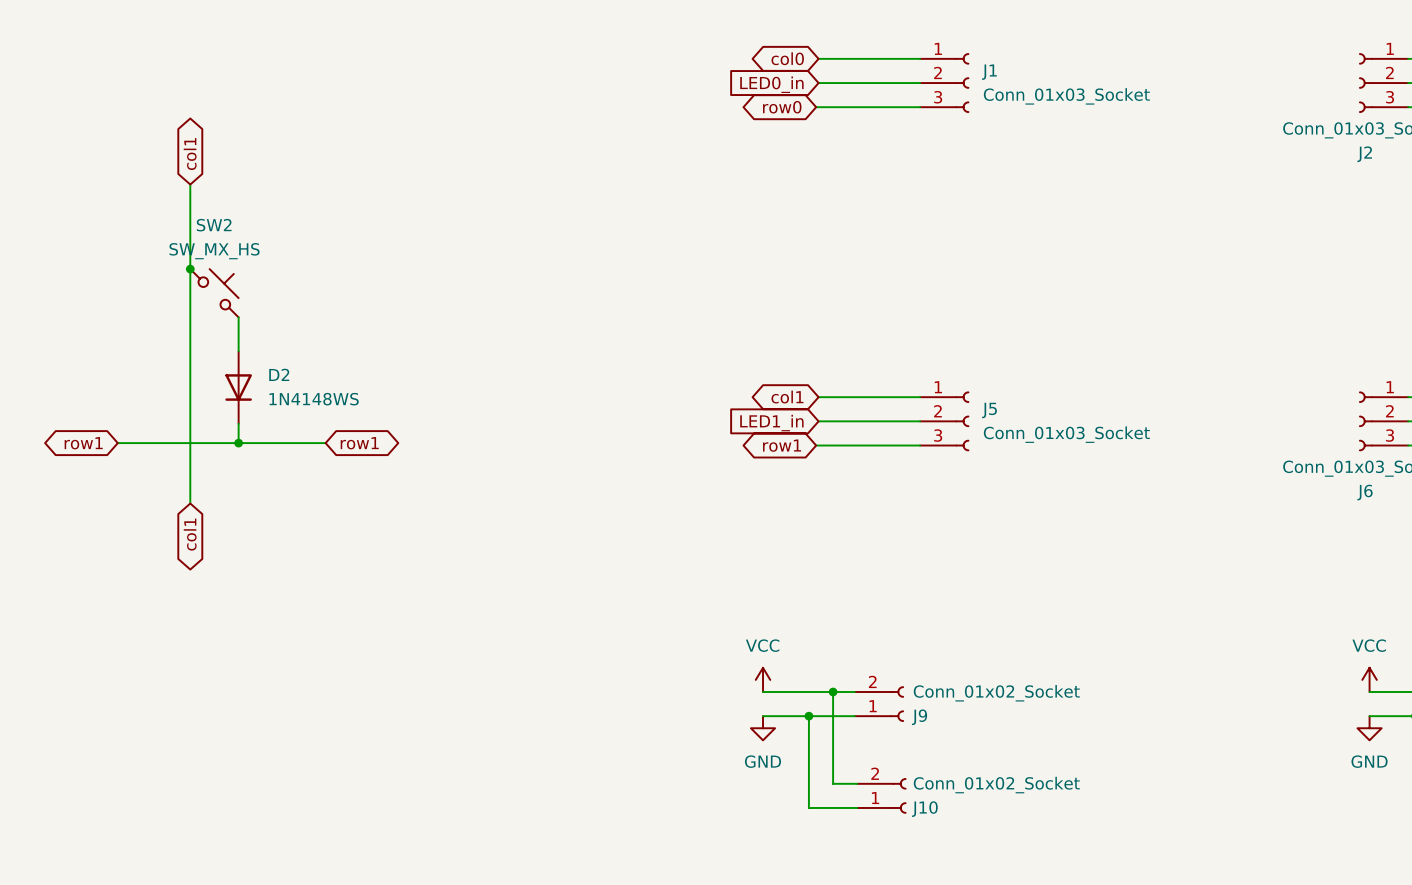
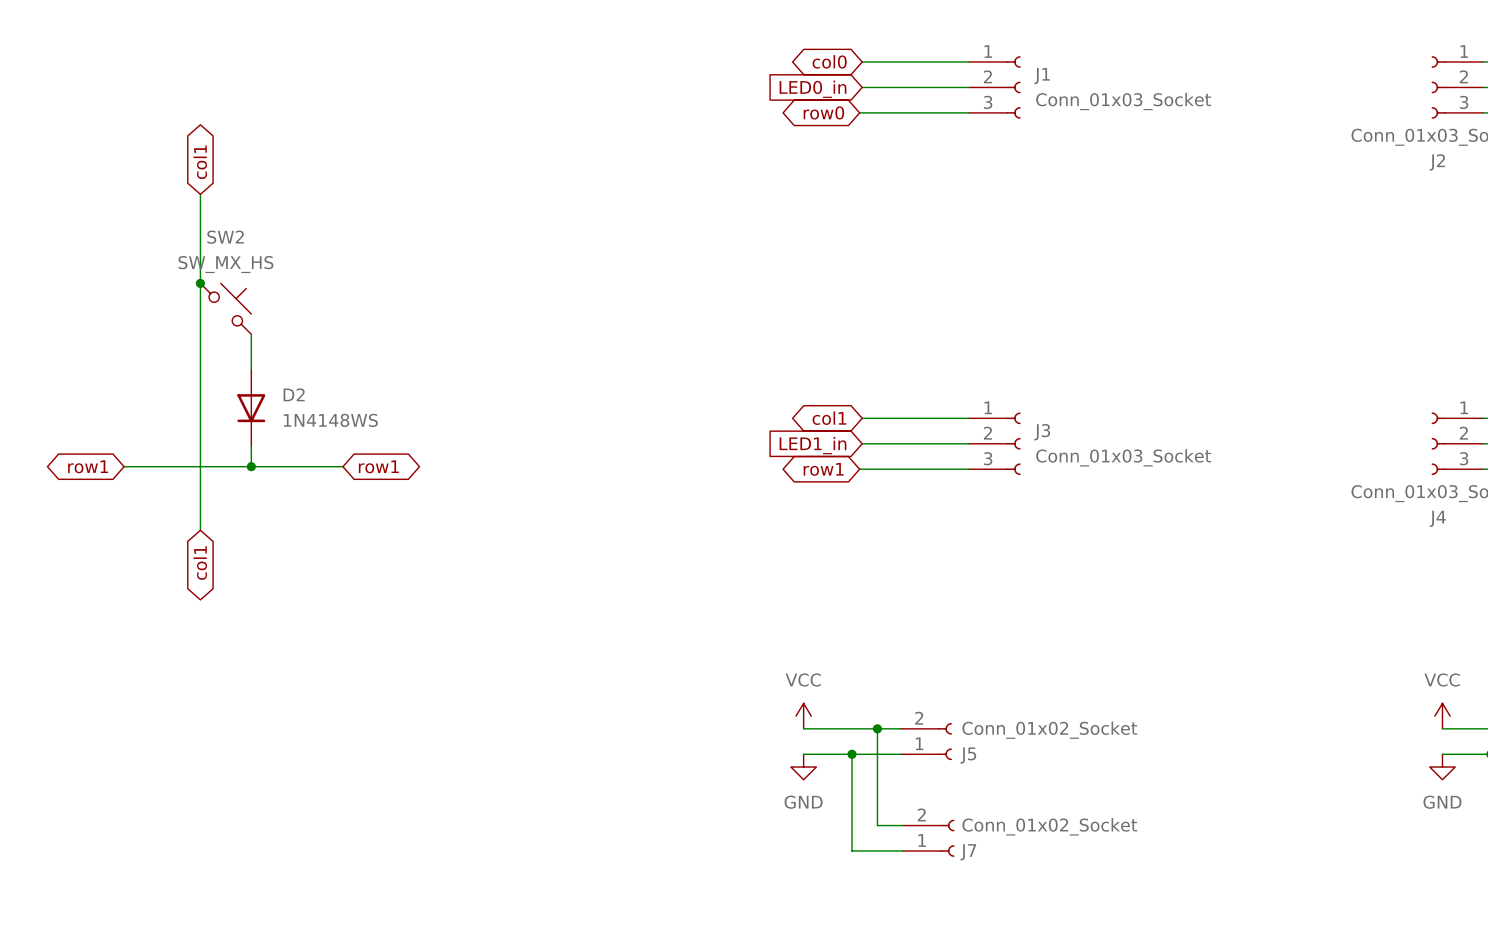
J5 name: J5 (989, 410) -> J3 (1042, 432)
J6 name: J6 (1364, 492) -> J4 (1437, 518)
J9 name: J9 (919, 717) -> J5 (968, 755)
J10 name: J10 (924, 809) -> J7 (968, 852)

